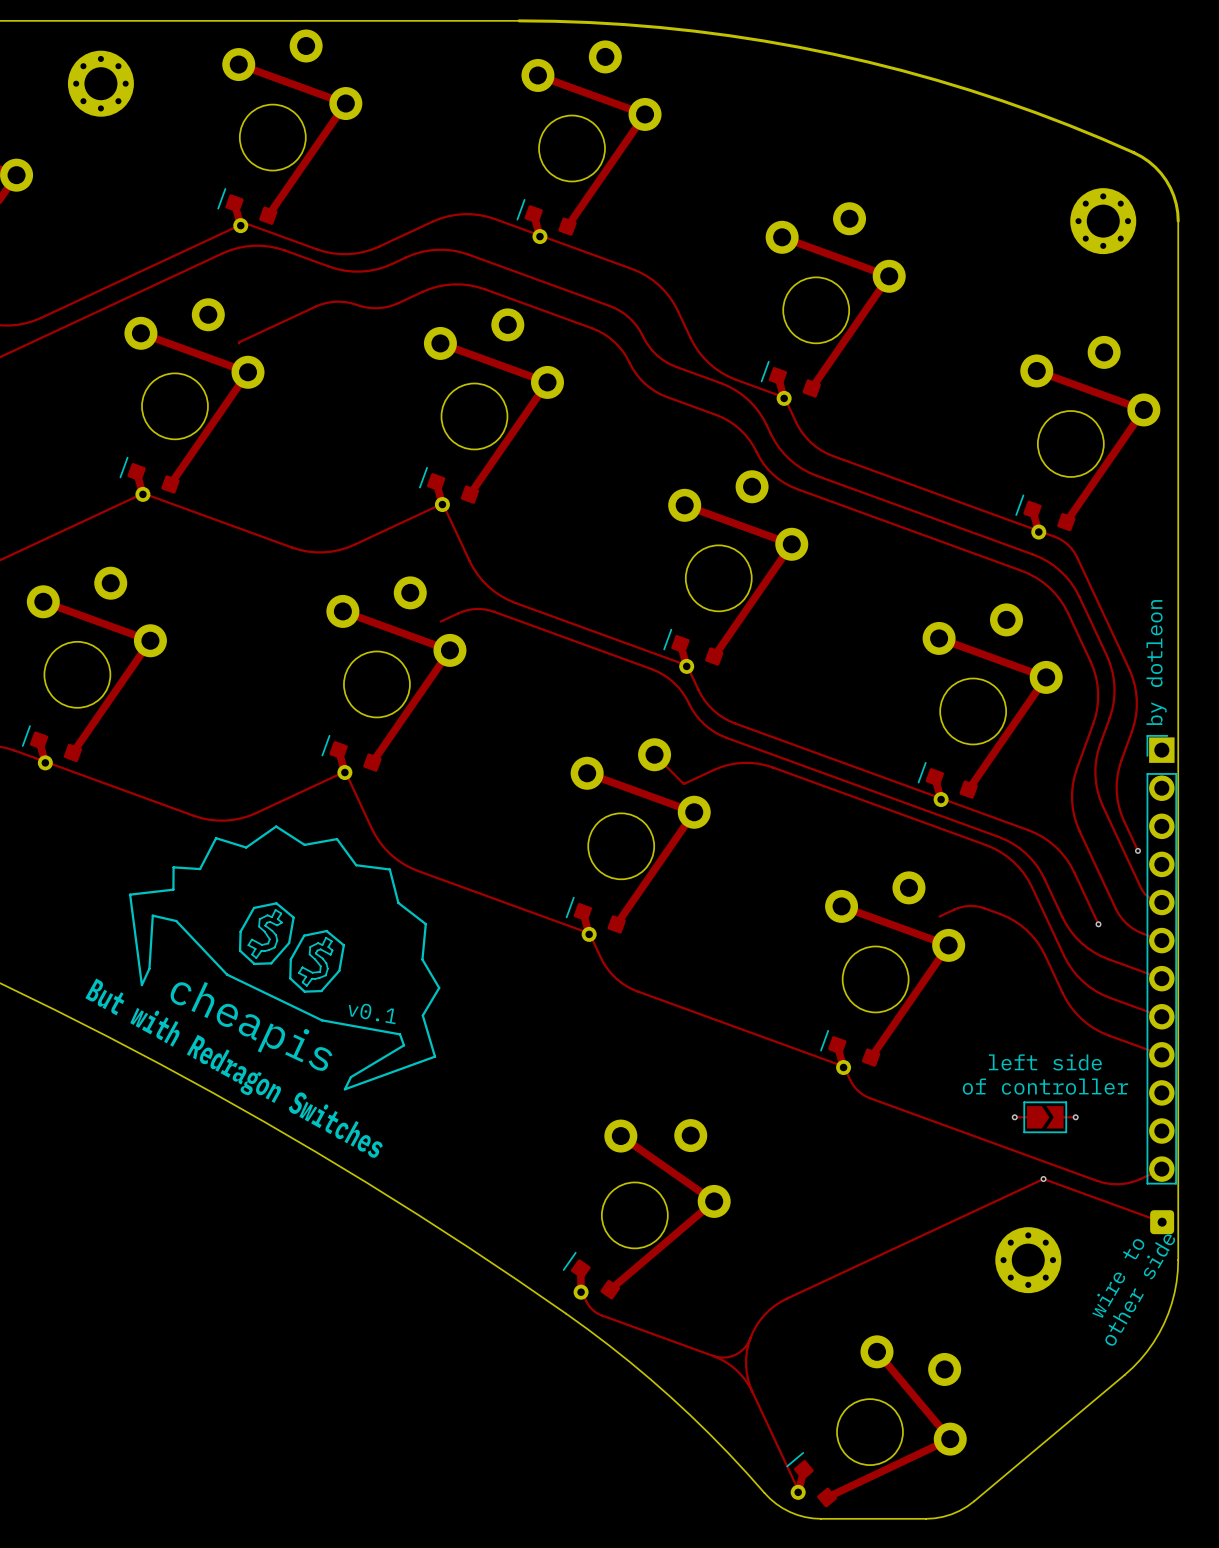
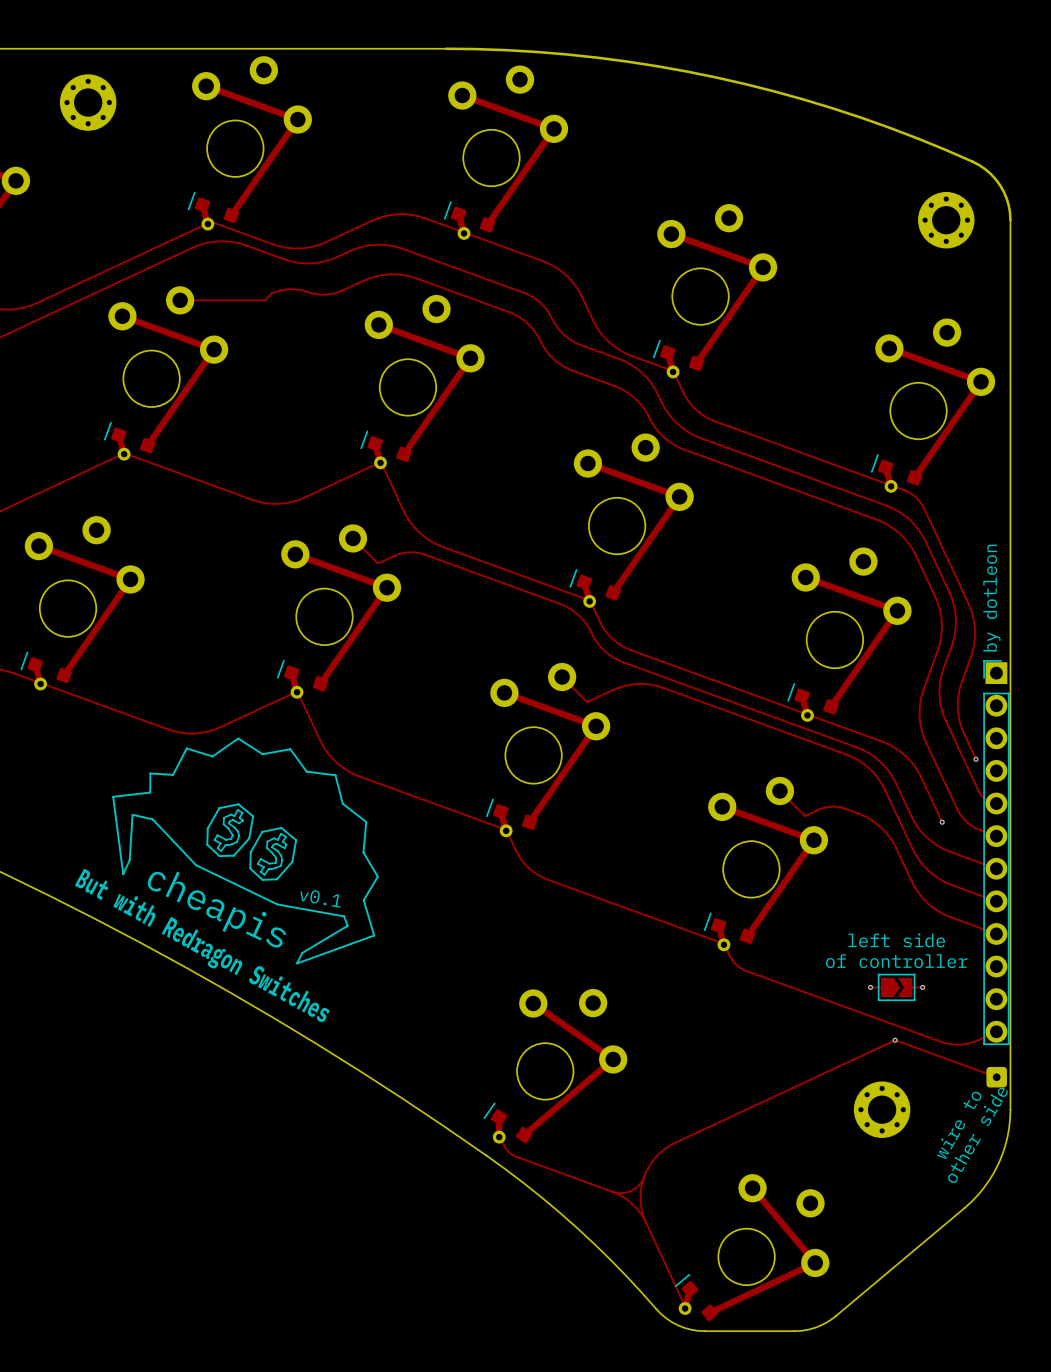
track: (315, 306) (238, 343) -> (271, 293) (264, 300) (180, 300)
track: none -> (353, 538) (379, 563)
track: none -> (779, 791) (806, 815)

